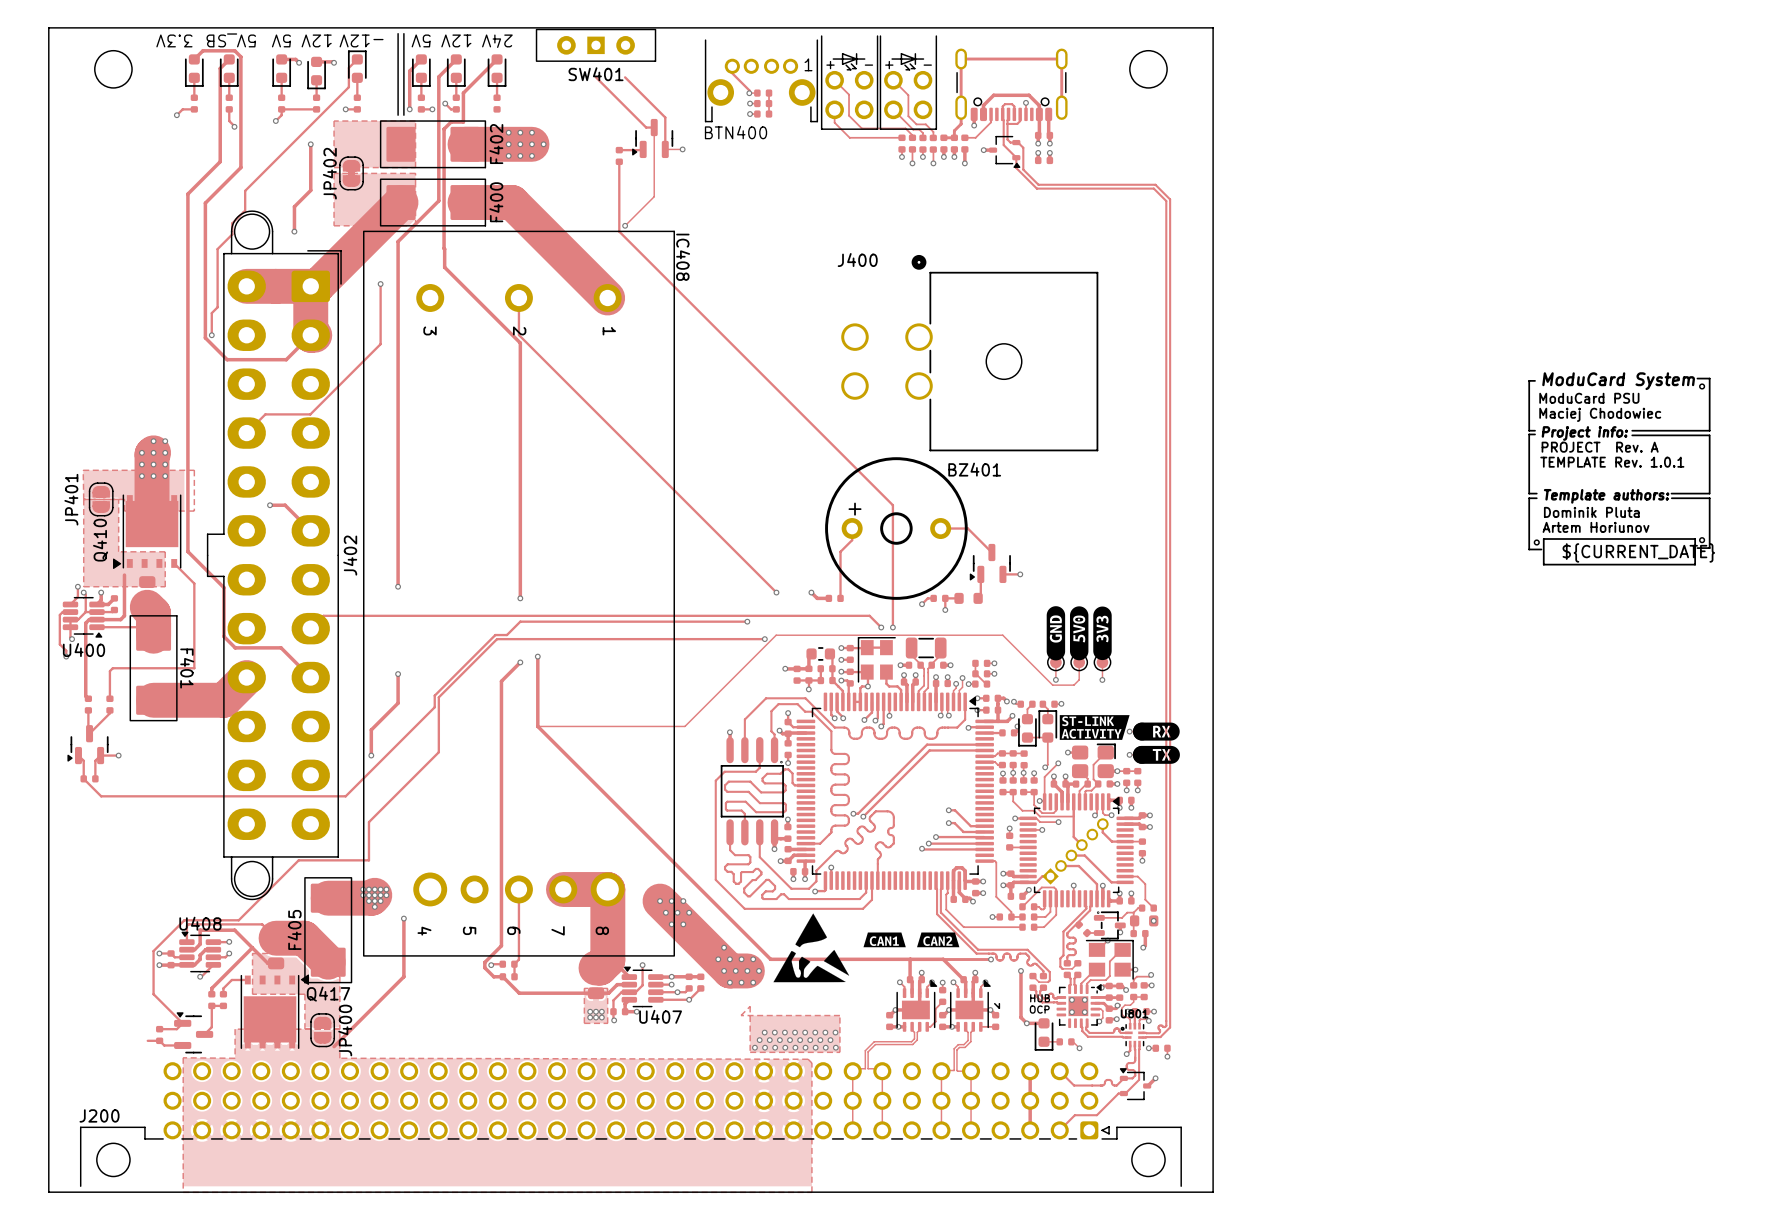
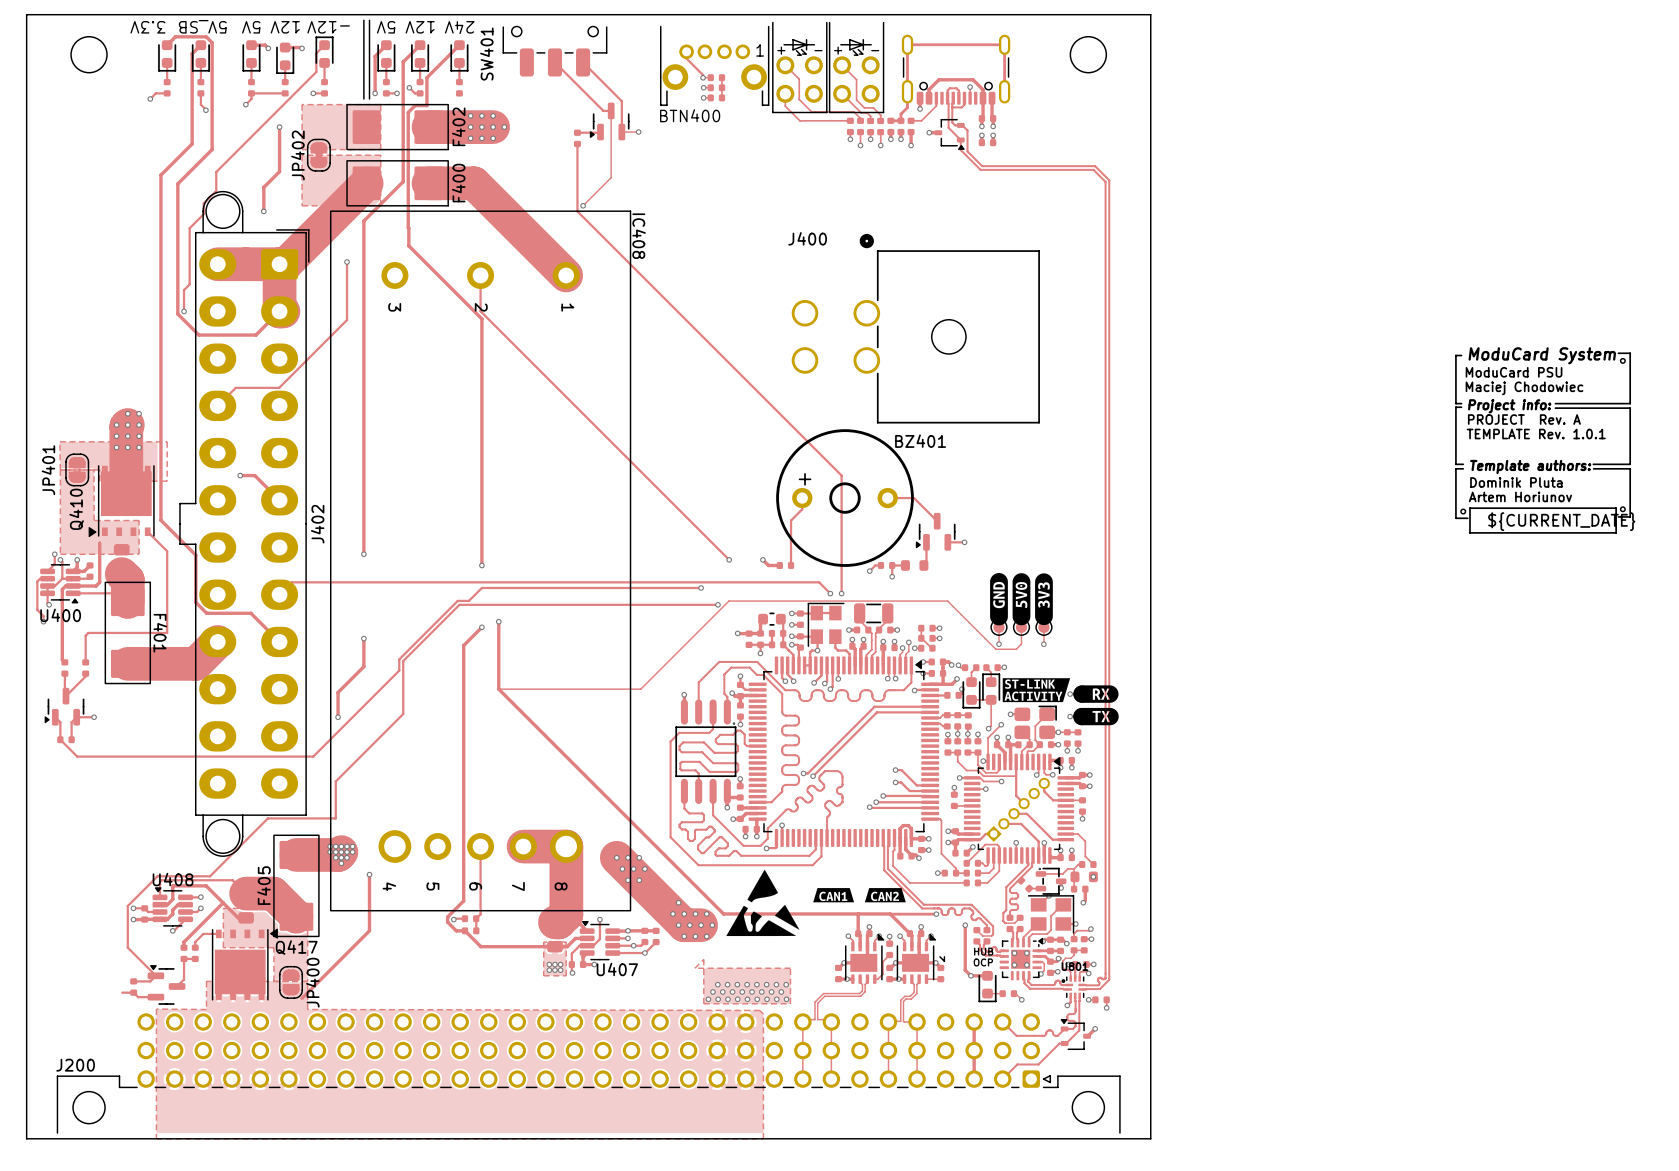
SW401 footprint: [535, 28, 657, 62] -> [502, 26, 608, 77]
SW401 name position: SW401 (596, 74) -> SW401 (486, 54)

